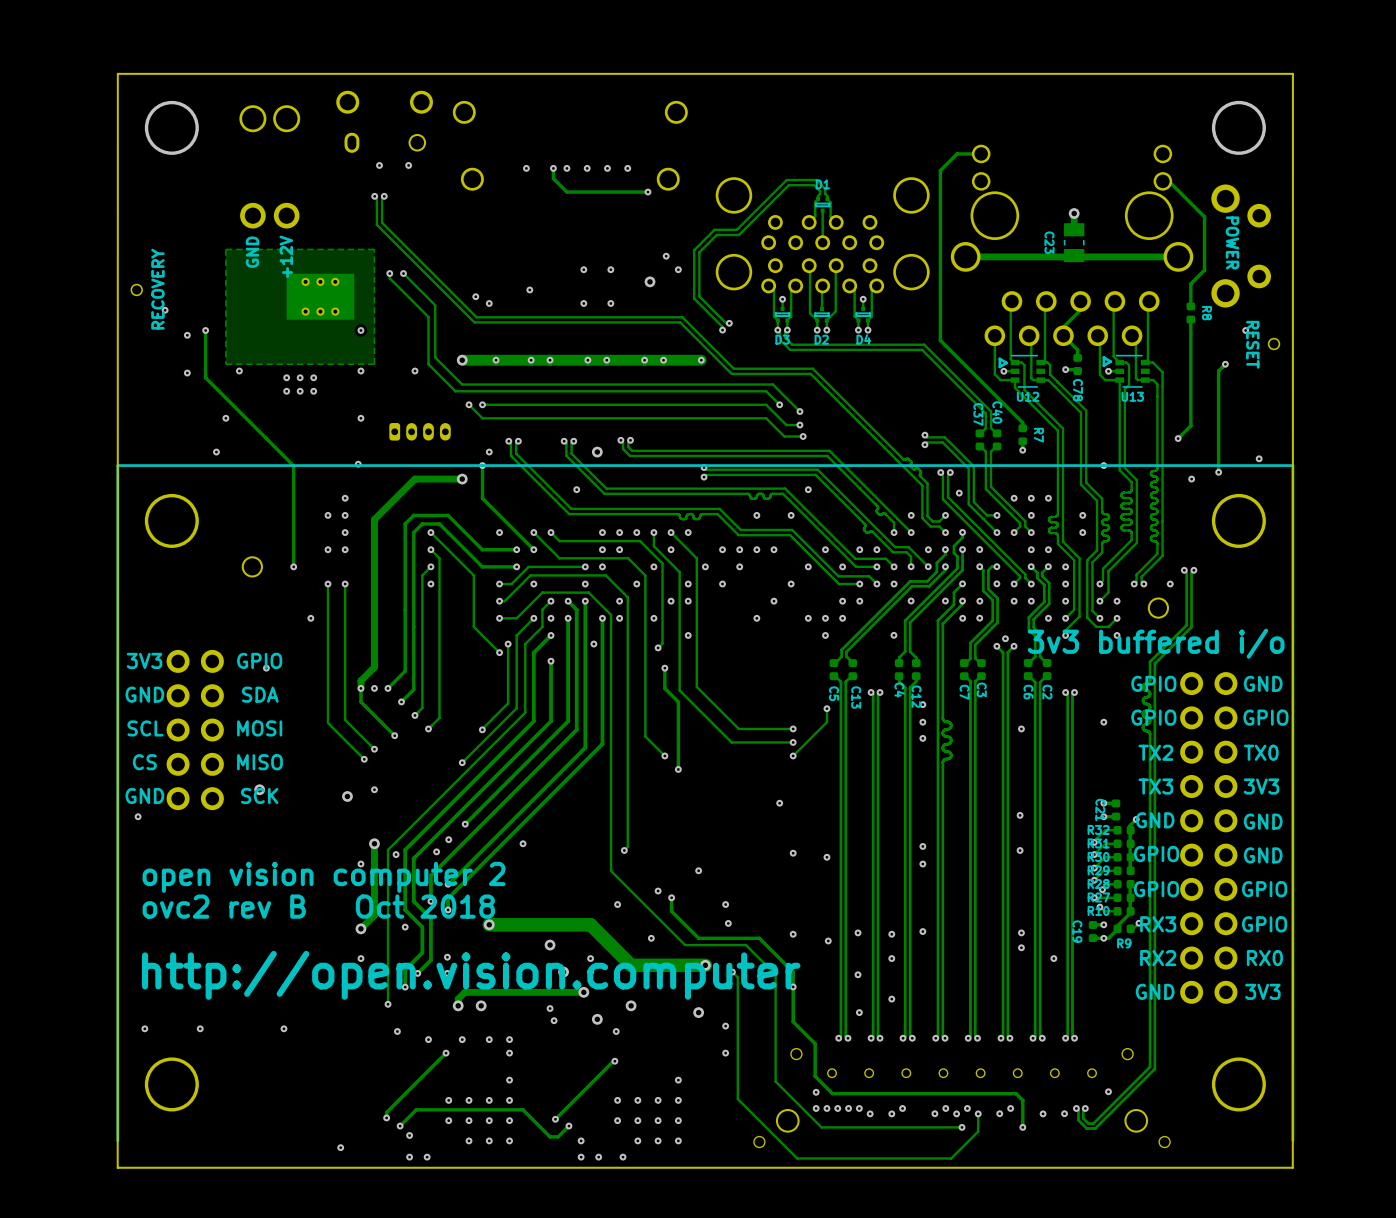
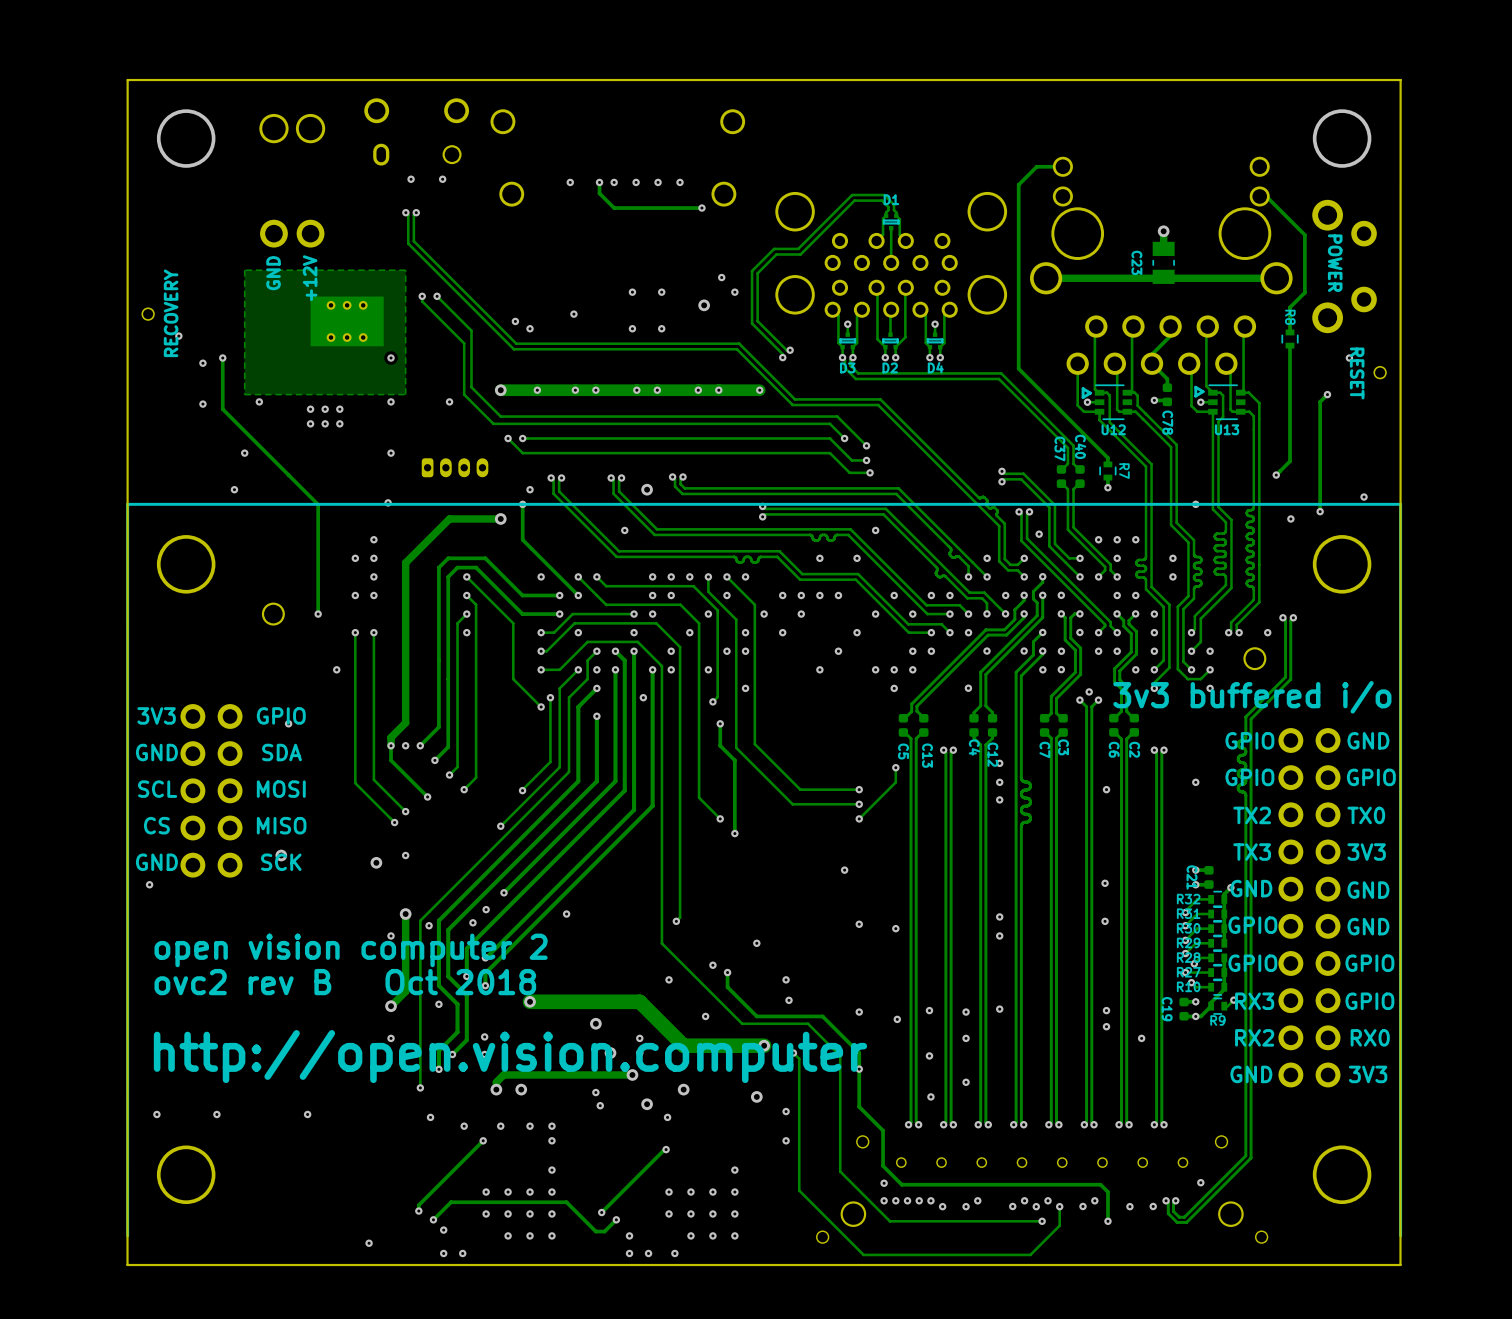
R8 footprint: [1186, 302, 1196, 324] -> [1281, 329, 1299, 349]
R7 footprint: [1018, 424, 1028, 446] -> [1099, 461, 1117, 481]
R32 footprint: [1113, 825, 1135, 835] -> [1208, 890, 1228, 909]
R31 footprint: [1113, 839, 1135, 849] -> [1208, 905, 1228, 923]
R30 footprint: [1113, 852, 1135, 862] -> [1208, 920, 1228, 938]
R29 footprint: [1113, 866, 1135, 876] -> [1208, 934, 1228, 952]
R28 footprint: [1113, 879, 1135, 889] -> [1208, 949, 1228, 967]
R27 footprint: [1113, 893, 1135, 903] -> [1208, 963, 1228, 982]
R10 footprint: [1113, 906, 1135, 916] -> [1208, 978, 1228, 996]
R9 footprint: [1113, 924, 1135, 934] -> [1208, 997, 1228, 1015]

